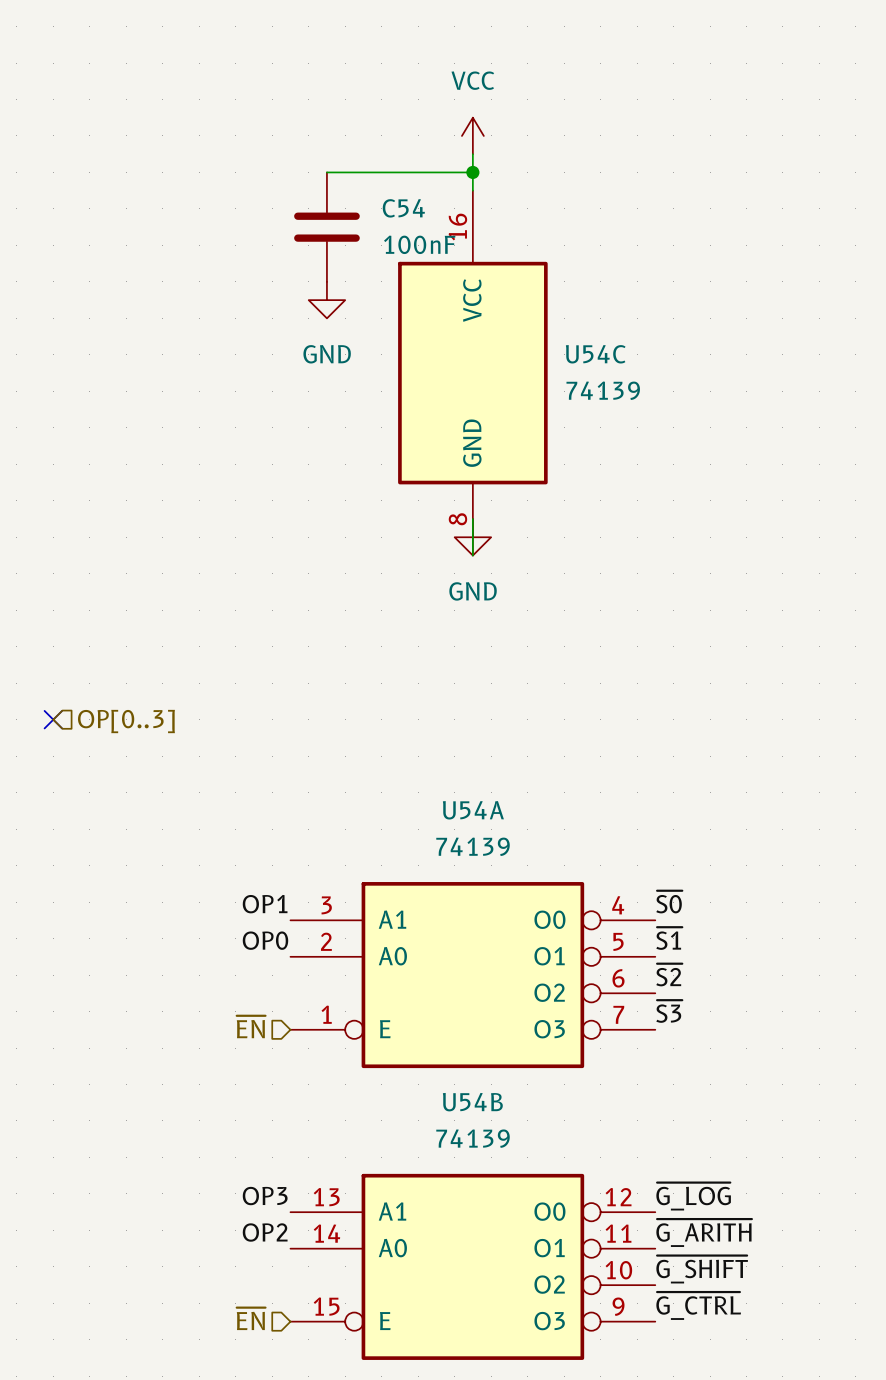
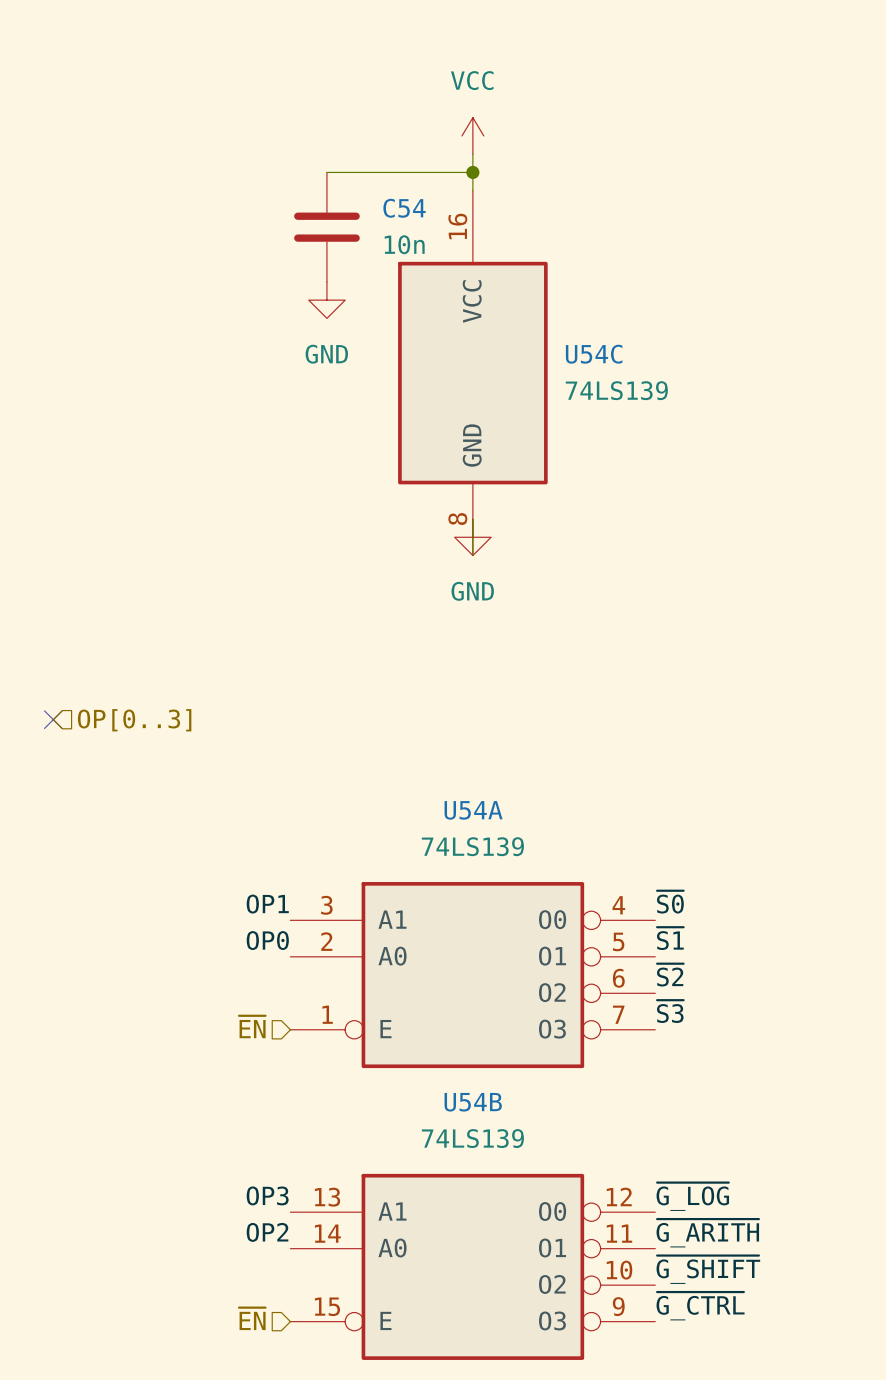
C54 value: 100nF (419, 244) -> 10n (404, 244)
U54C value: 74139 (603, 390) -> 74LS139 (616, 390)
U54A value: 74139 (473, 846) -> 74LS139 (472, 846)
U54B value: 74139 (473, 1138) -> 74LS139 (472, 1138)

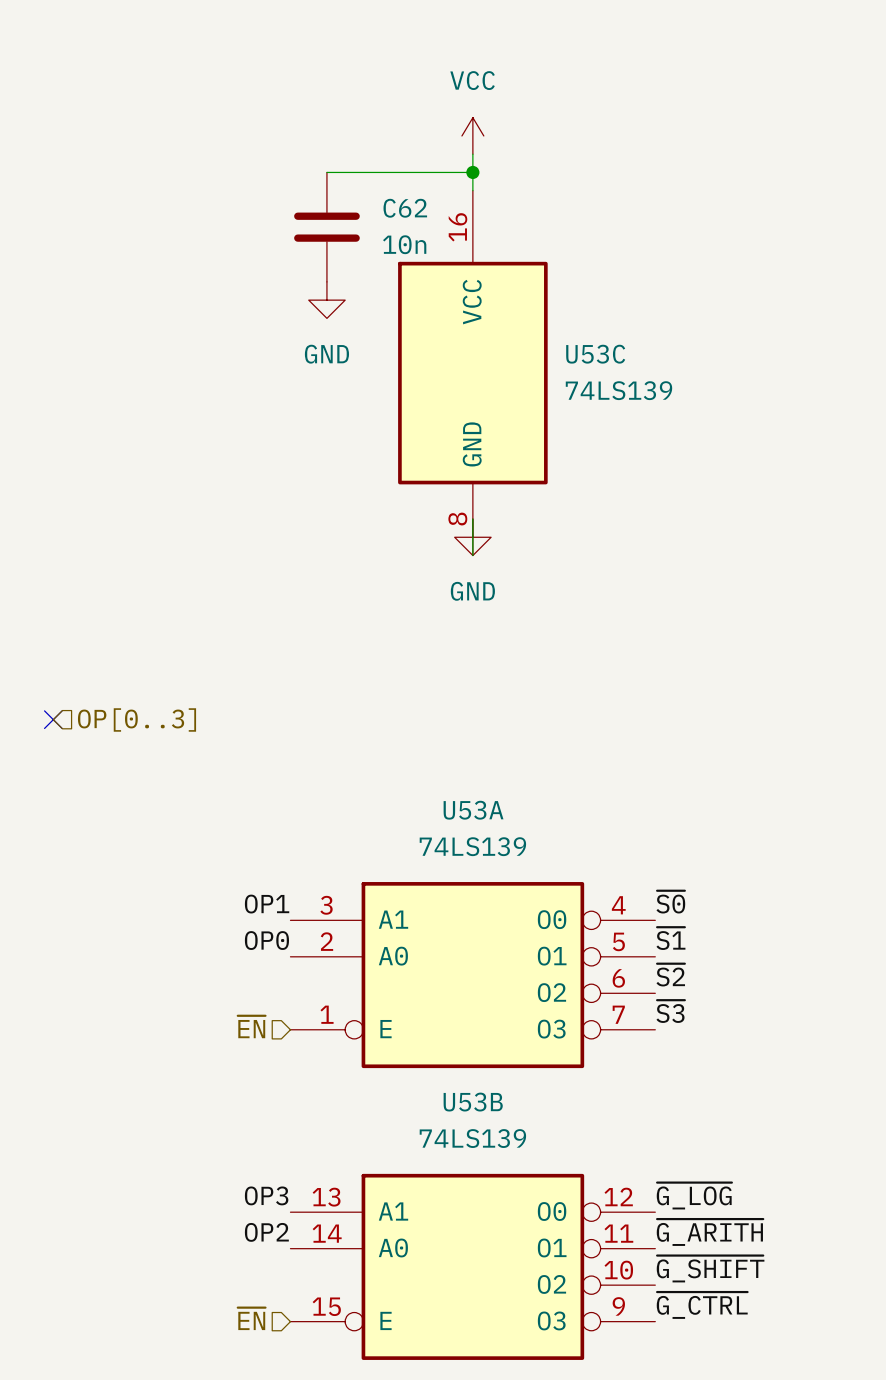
C54 name: C54 (404, 208) -> C62 (405, 208)
U54C name: U54C (594, 354) -> U53C (595, 354)
U54A name: U54A (473, 810) -> U53A (473, 810)
U54B name: U54B (473, 1102) -> U53B (473, 1102)

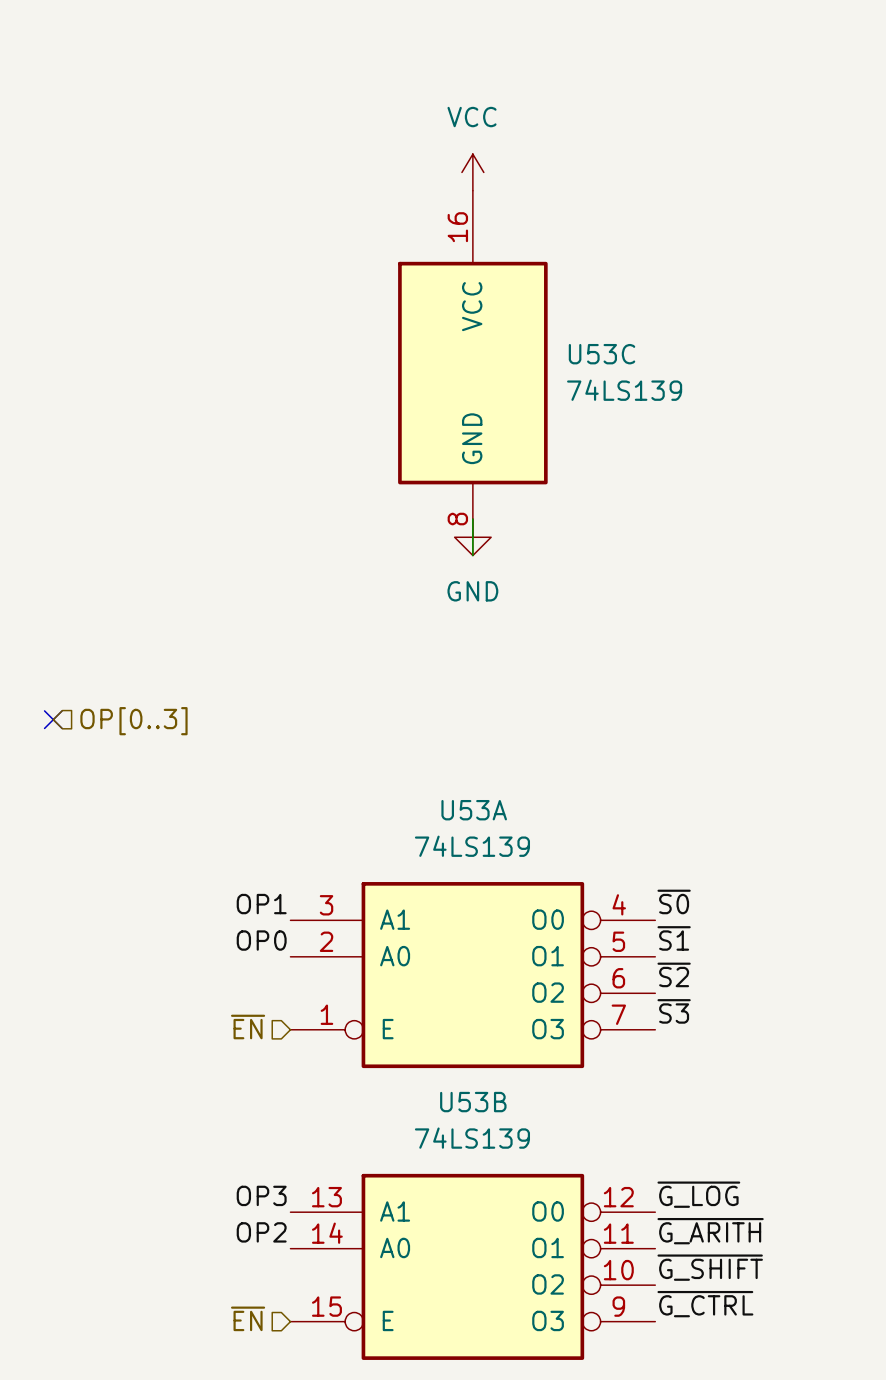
power symbol position: VCC (472, 135) -> VCC (472, 172)
wire: (326, 172) (472, 172) -> none
junction: (472, 172) -> none
C62: 10n (326, 227) -> none
power symbol: GND (326, 300) -> none

